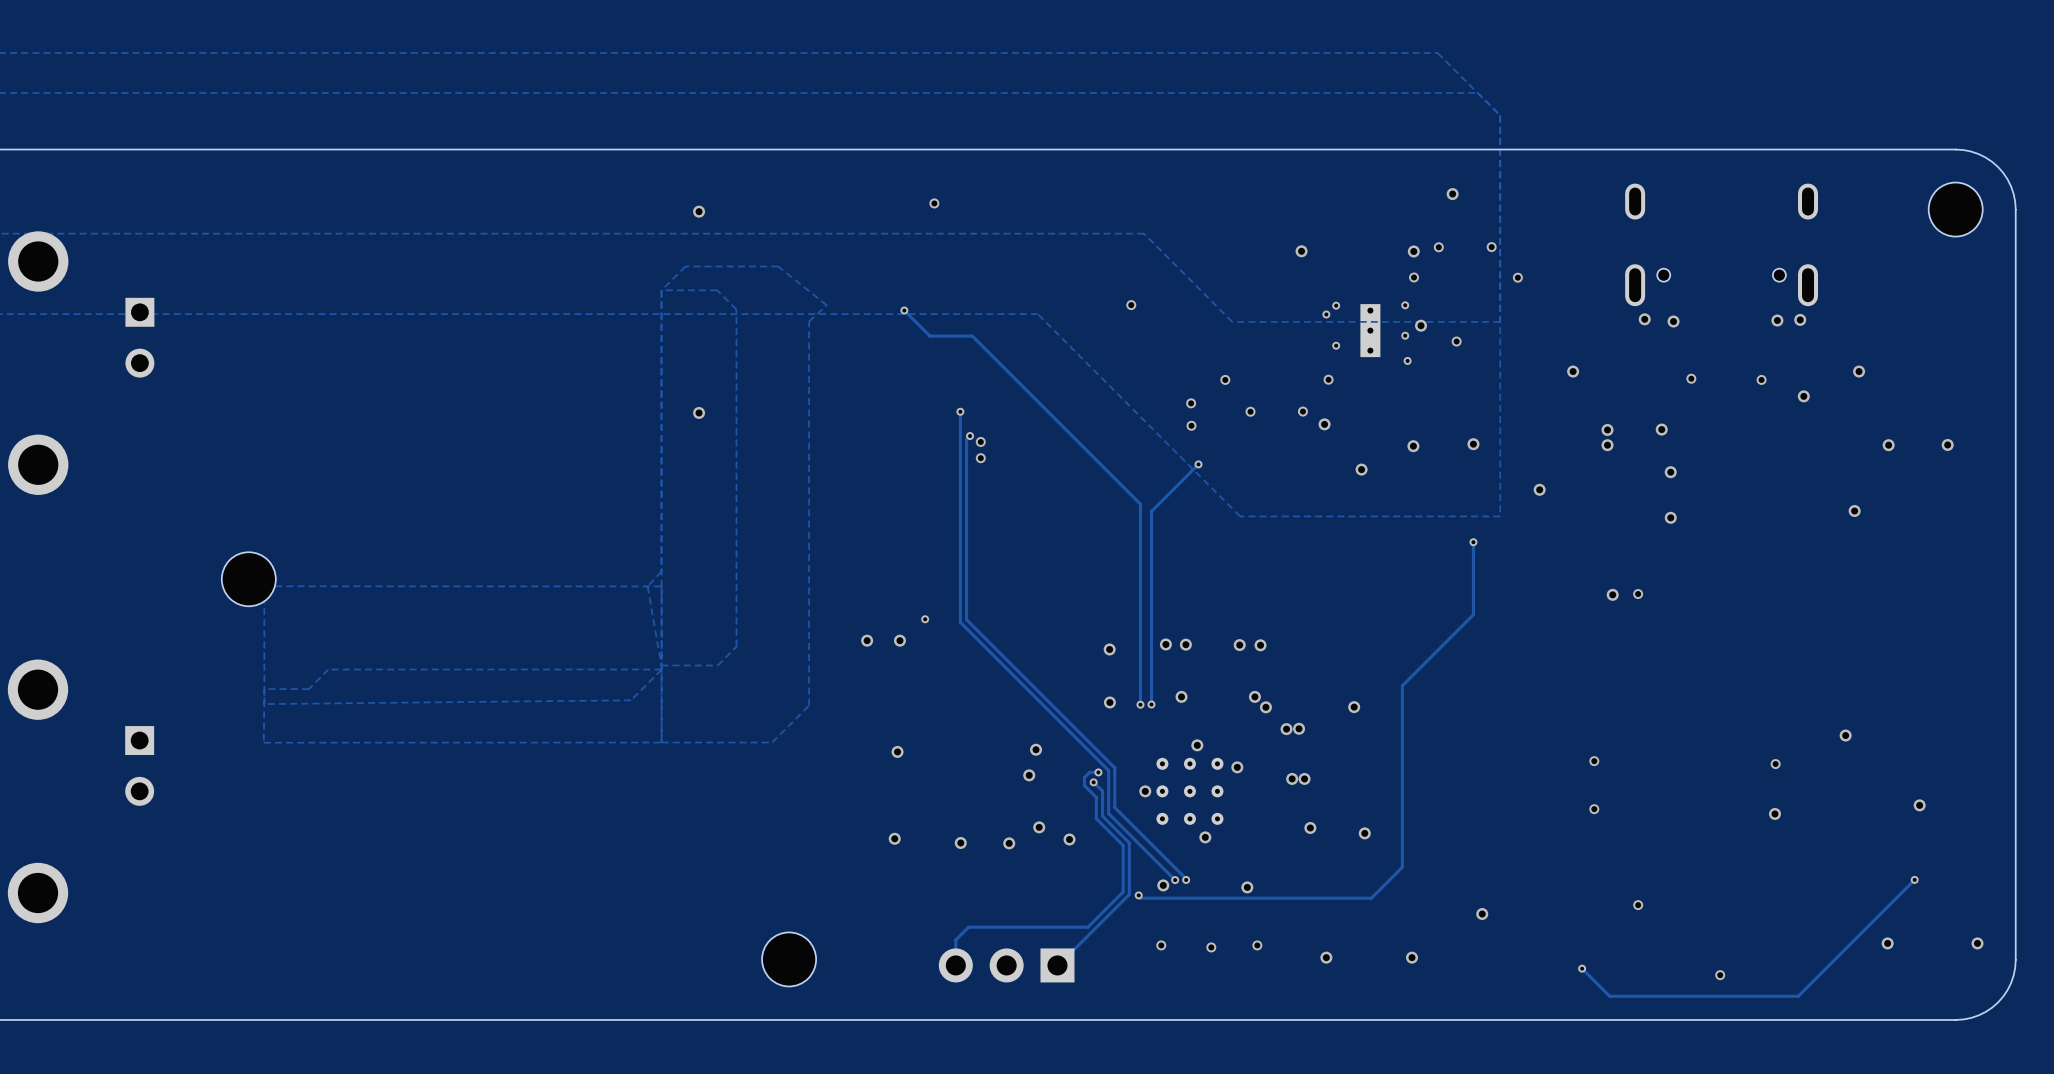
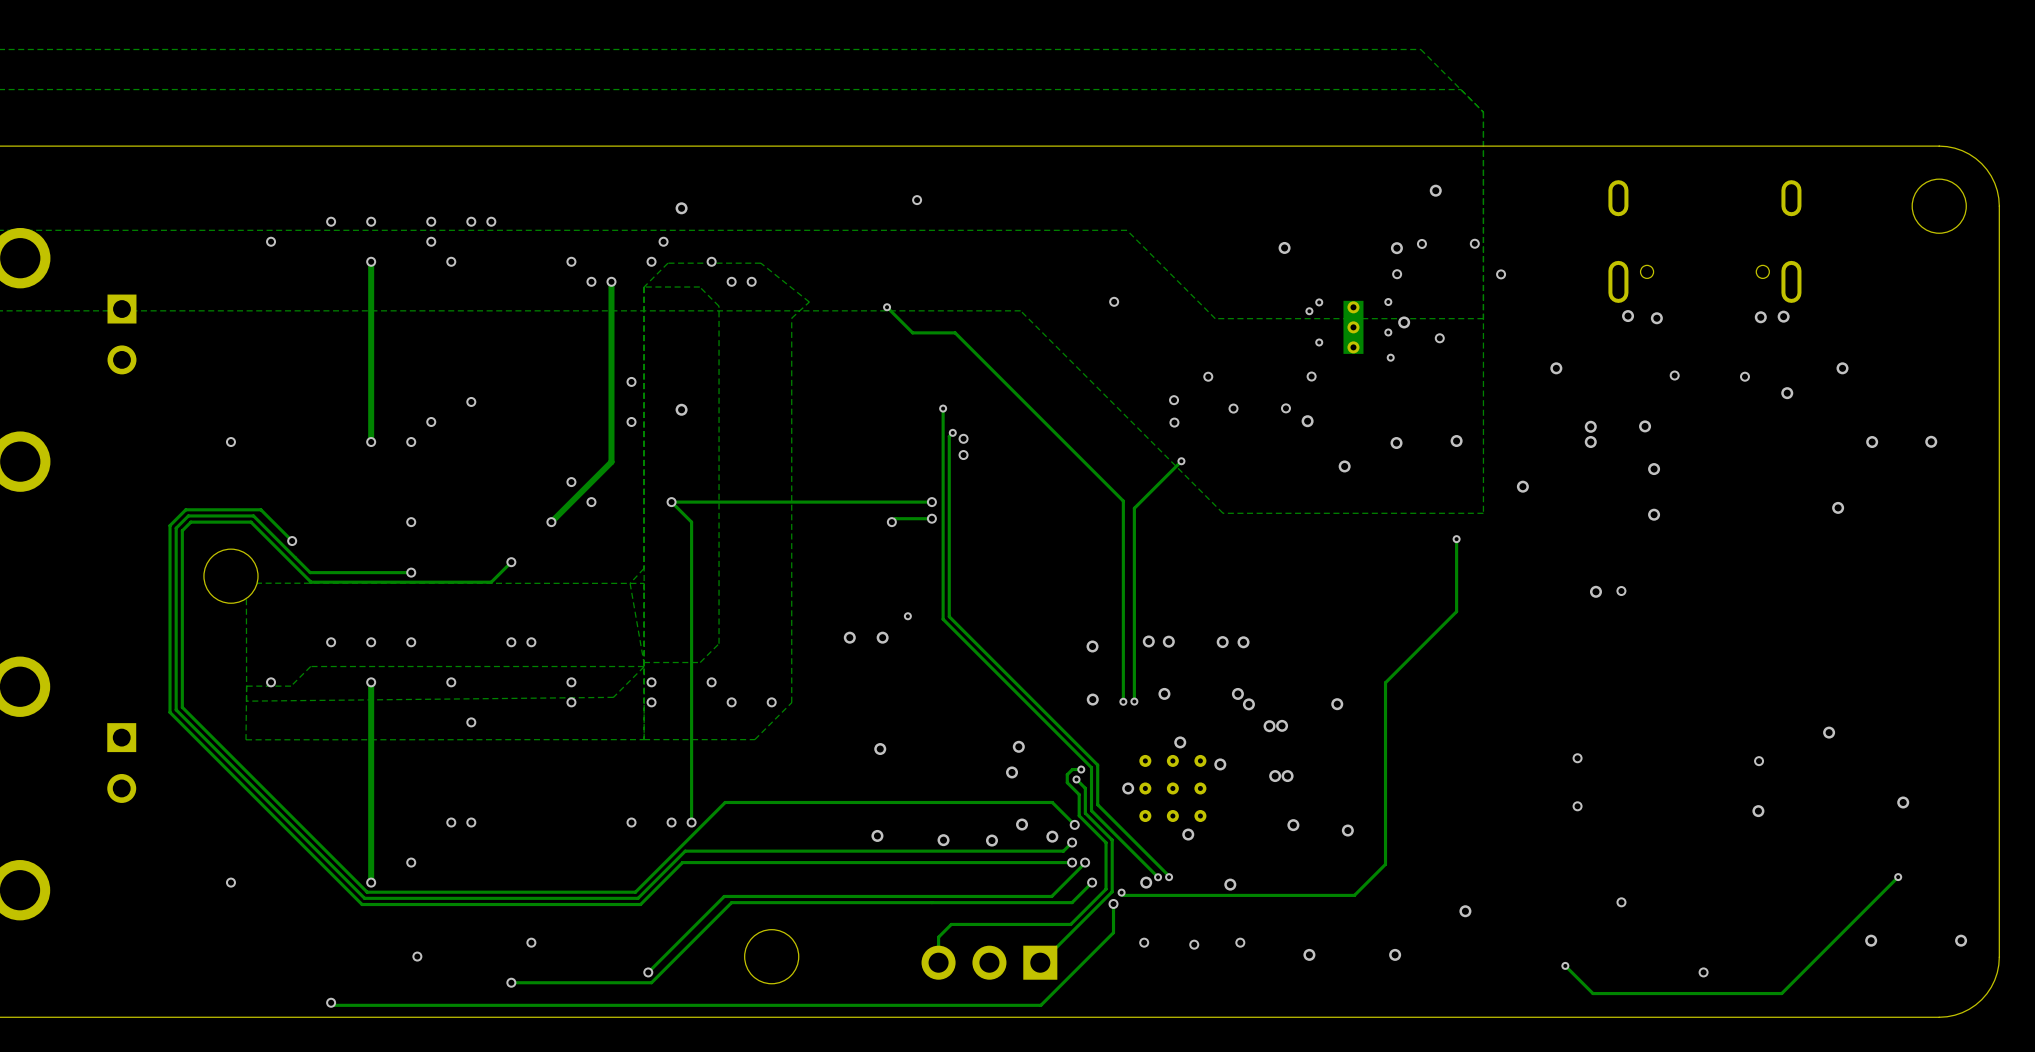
via: none -> (331, 221)
via: none -> (371, 221)
via: none -> (431, 221)
via: none -> (471, 221)
via: none -> (491, 221)
via: none -> (271, 241)
via: none -> (431, 241)
via: none -> (663, 241)
track: none -> (371, 261) (371, 442)
via: none -> (371, 261)
via: none -> (451, 261)
via: none -> (571, 261)
via: none -> (651, 261)
via: none -> (711, 261)
via: none -> (591, 281)
track: none -> (611, 281) (611, 462) (551, 522)
via: none -> (611, 281)
via: none -> (731, 281)
via: none -> (751, 281)
via: none -> (631, 381)
via: none -> (471, 401)
via: none -> (431, 421)
via: none -> (631, 421)
via: none -> (230, 442)
via: none -> (371, 442)
via: none -> (411, 442)
via: none -> (571, 482)
via: none -> (591, 502)
via: none -> (671, 502)
track: none -> (931, 502) (671, 502) (691, 522) (691, 822)
via: none -> (931, 502)
track: none -> (931, 518) (895, 518) (891, 522)
via: none -> (931, 518)
via: none -> (411, 522)
via: none -> (551, 522)
via: none -> (891, 522)
track: none -> (292, 541) (260, 509) (185, 509) (170, 525) (170, 712) (362, 904) (640, 904) (682, 862) (1072, 862)
via: none -> (292, 541)
track: none -> (511, 562) (491, 582) (311, 582) (251, 522) (190, 522) (182, 530) (182, 707) (367, 892) (635, 892) (725, 802) (1052, 802) (1074, 824)
via: none -> (511, 562)
track: none -> (411, 572) (310, 572) (253, 515) (188, 515) (176, 528) (176, 709) (364, 898) (638, 898) (685, 851) (1063, 851) (1072, 842)
via: none -> (411, 572)
via: none -> (331, 642)
via: none -> (371, 642)
via: none -> (411, 642)
via: none -> (511, 642)
via: none -> (531, 642)
via: none -> (271, 682)
track: none -> (371, 682) (371, 882)
via: none -> (371, 682)
via: none -> (451, 682)
via: none -> (571, 682)
via: none -> (651, 682)
via: none -> (711, 682)
via: none -> (571, 702)
via: none -> (651, 702)
via: none -> (731, 702)
via: none -> (771, 702)
via: none -> (471, 722)
via: none -> (451, 822)
via: none -> (471, 822)
via: none -> (631, 822)
via: none -> (671, 822)
via: none -> (691, 822)
via: none -> (1074, 824)
via: none -> (1072, 842)
via: none -> (411, 862)
via: none -> (1072, 862)
track: none -> (1085, 862) (1051, 896) (724, 896) (648, 972)
via: none -> (1085, 862)
via: none -> (230, 882)
via: none -> (371, 882)
track: none -> (1092, 882) (1072, 902) (731, 902) (651, 982) (511, 982)
via: none -> (1092, 882)
track: none -> (1113, 903) (1113, 932) (1040, 1005) (333, 1005) (331, 1002)
via: none -> (1113, 903)
via: none -> (531, 942)
via: none -> (417, 956)
via: none -> (648, 972)
via: none -> (511, 982)
via: none -> (331, 1002)

